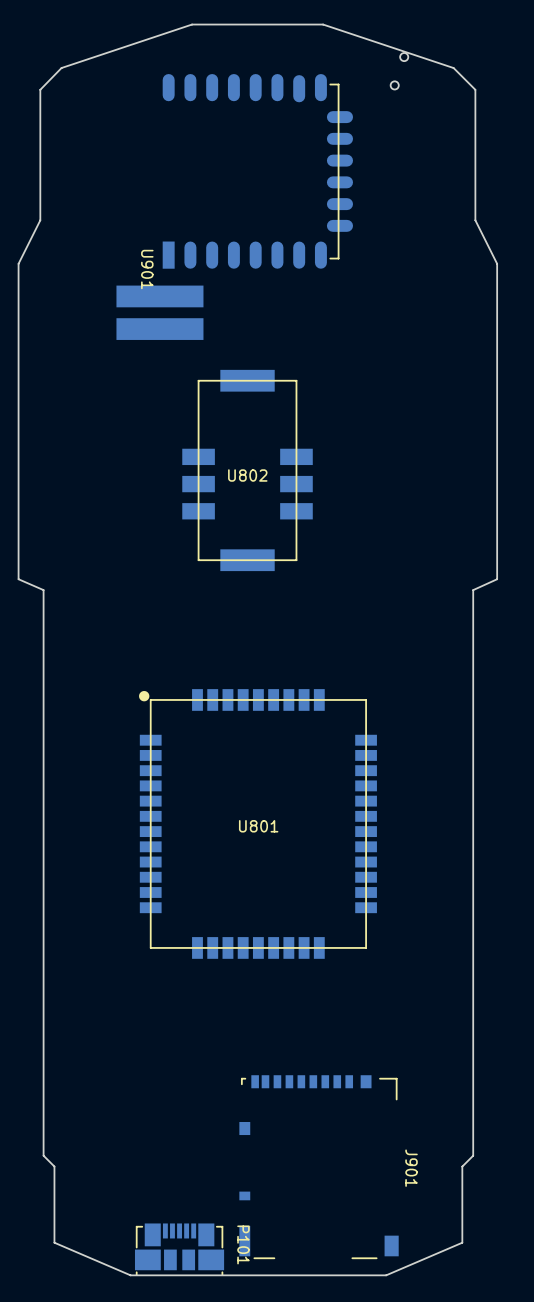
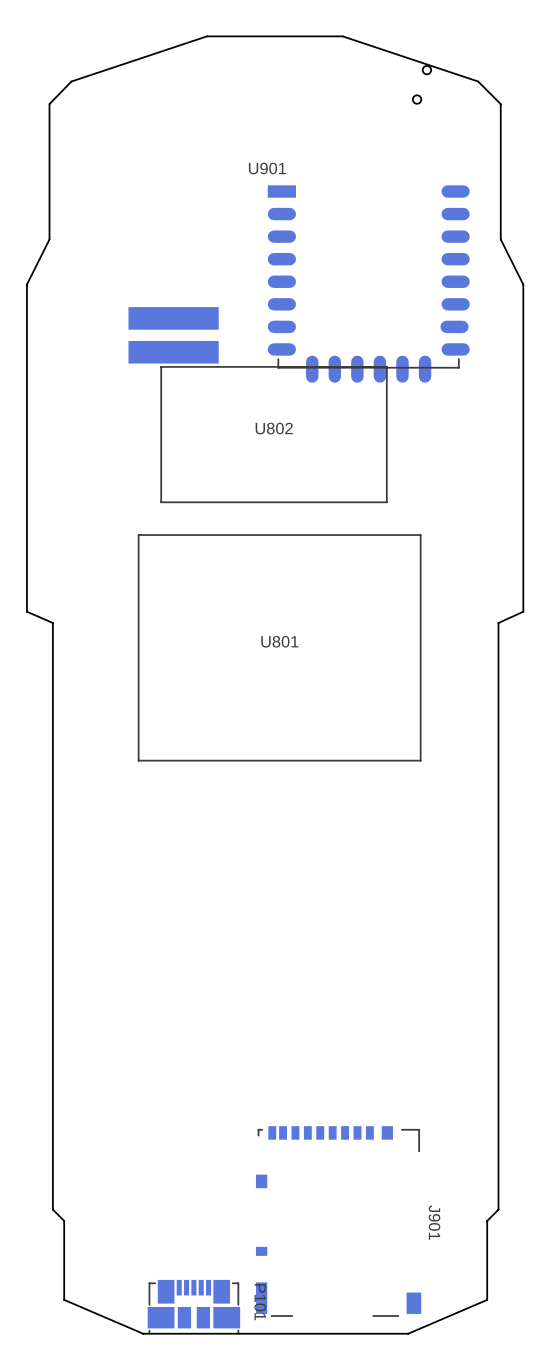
U901 rotation: 0° (257, 171) -> 90° clockwise (368, 284)
U901 position: (257, 171) -> (368, 284)
U802 footprint: [182, 369, 313, 572] -> [160, 366, 388, 504]
U801 footprint: [139, 689, 377, 959] -> [137, 534, 422, 762]

